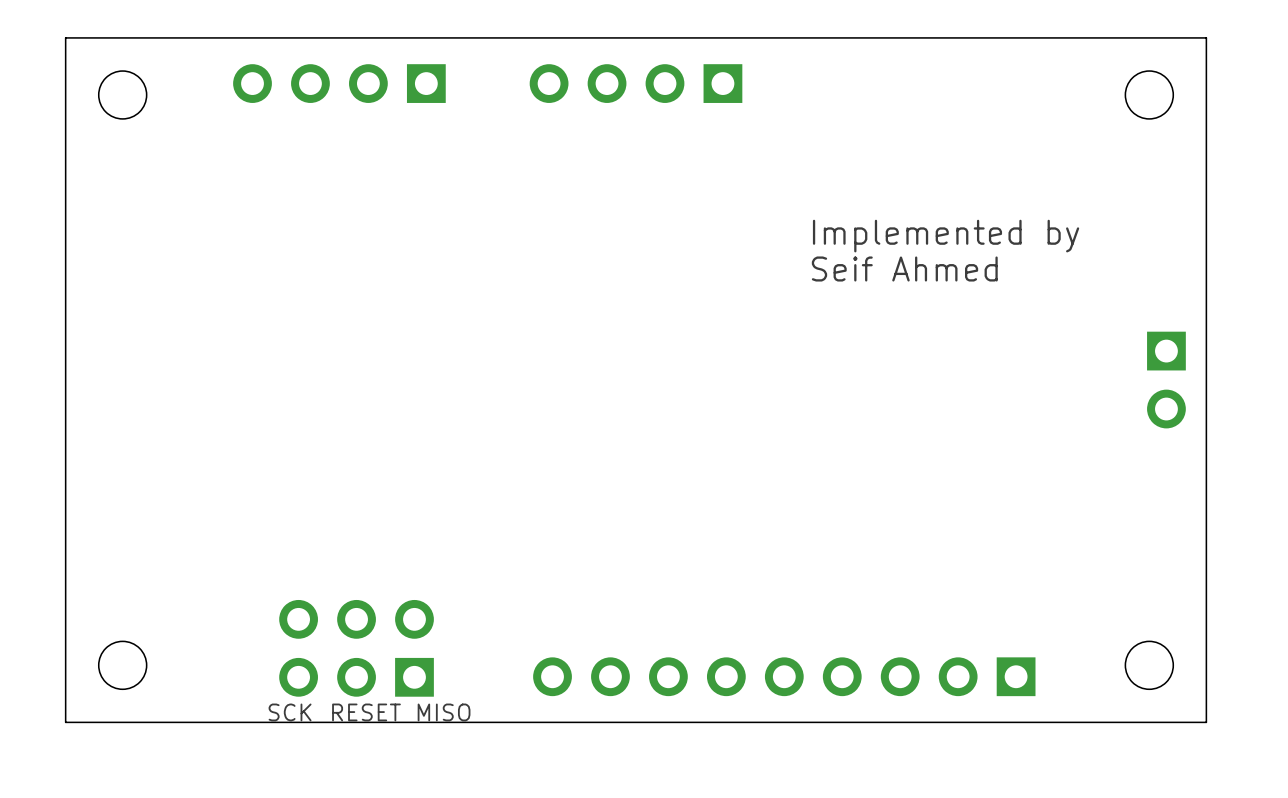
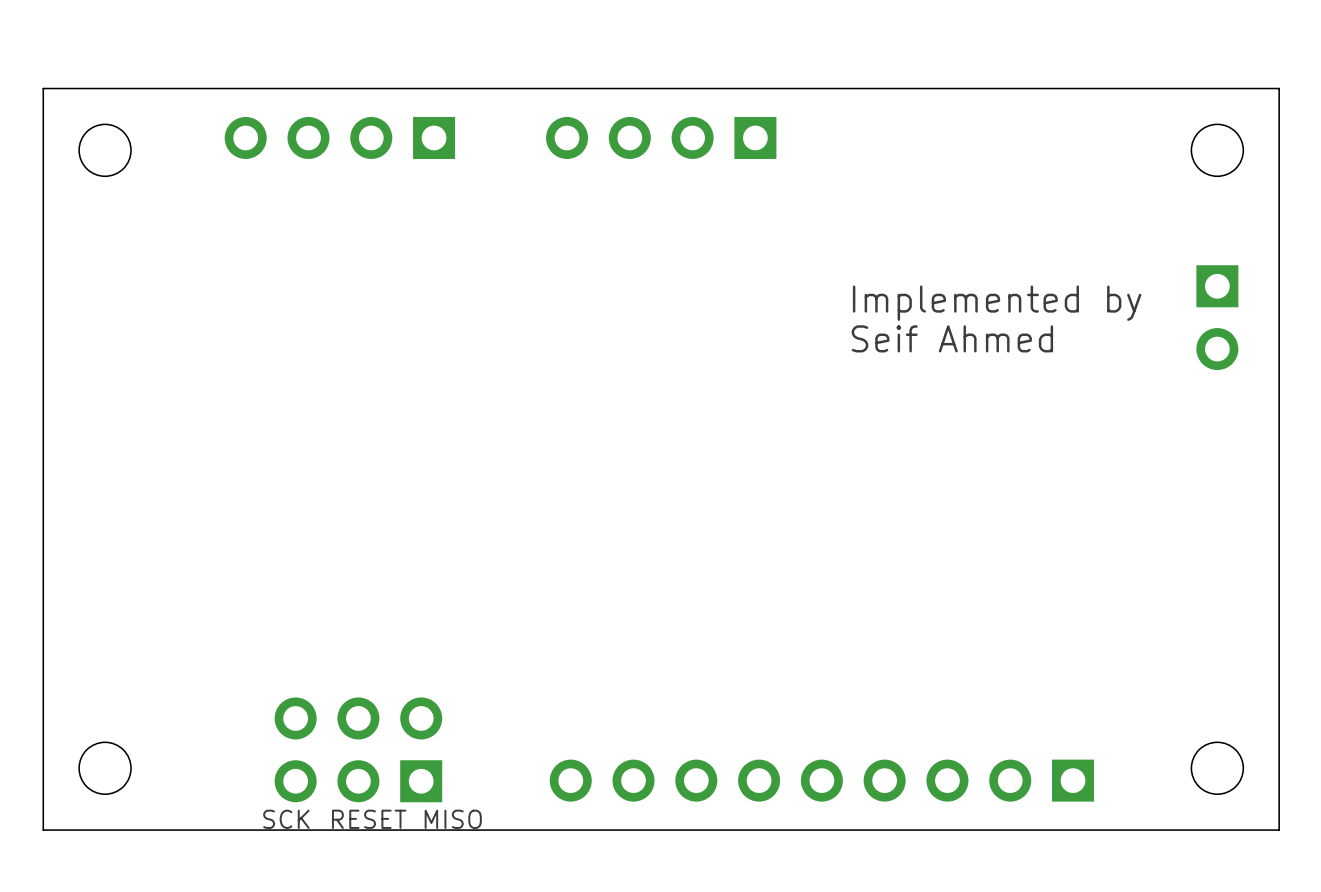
part position: (1166, 380) -> (1217, 317)

